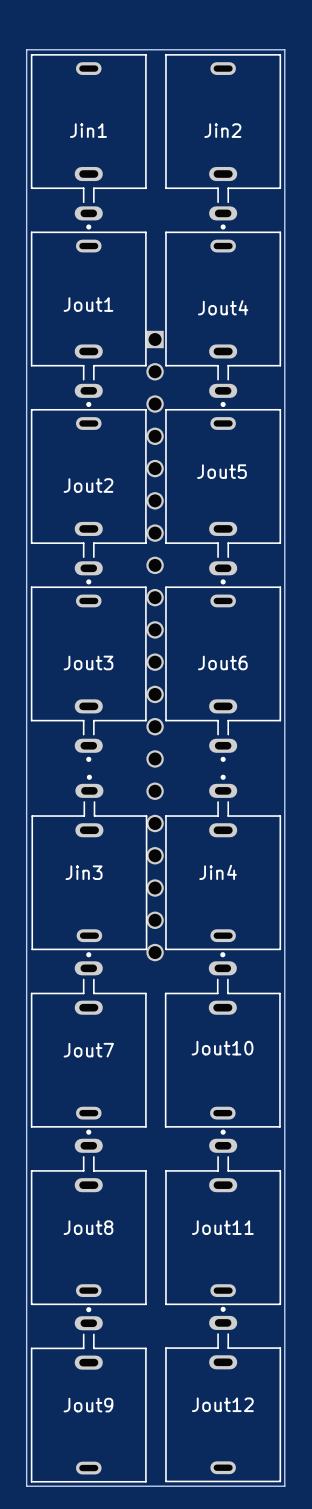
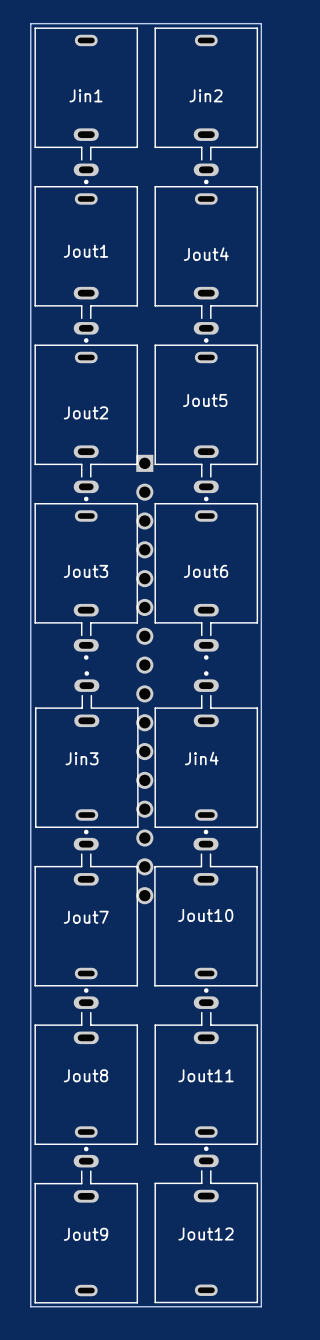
part: (155, 646) -> none
part: none -> (144, 679)

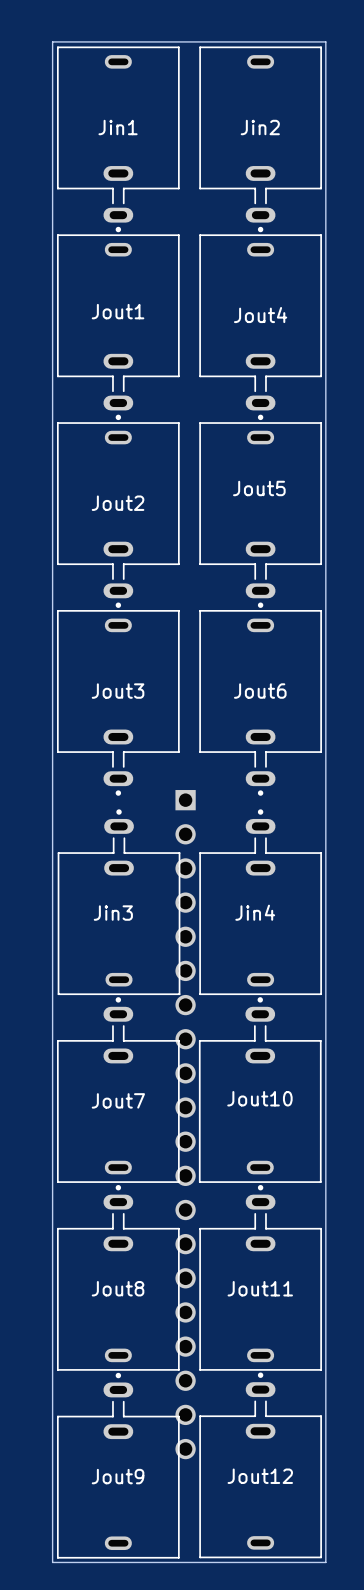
part: (144, 679) -> none
part: none -> (185, 1124)

